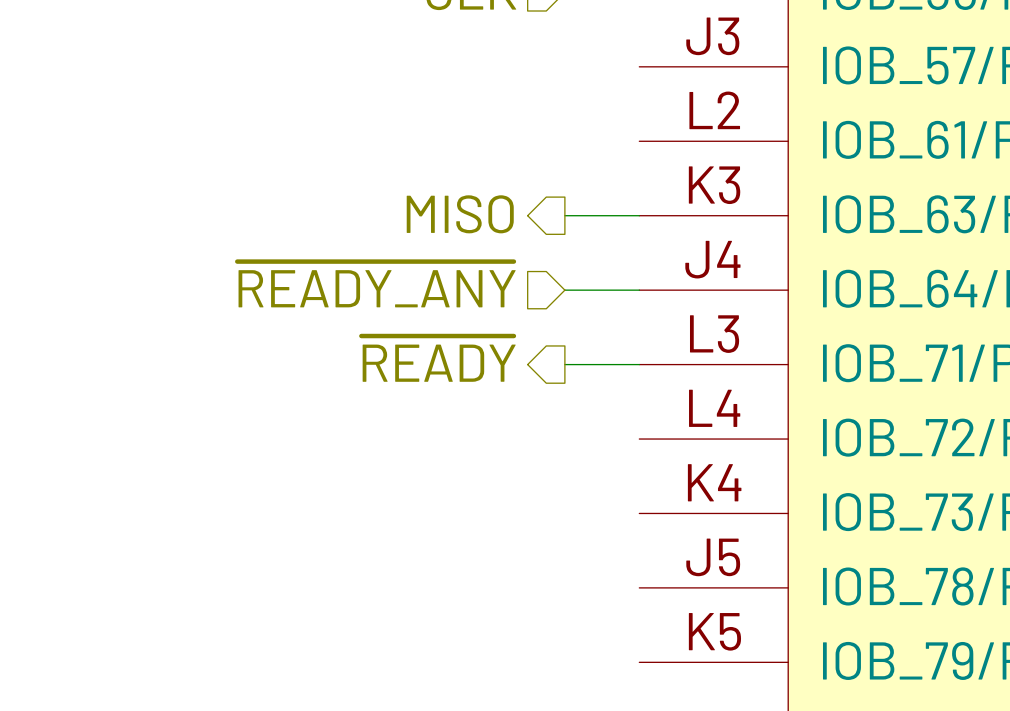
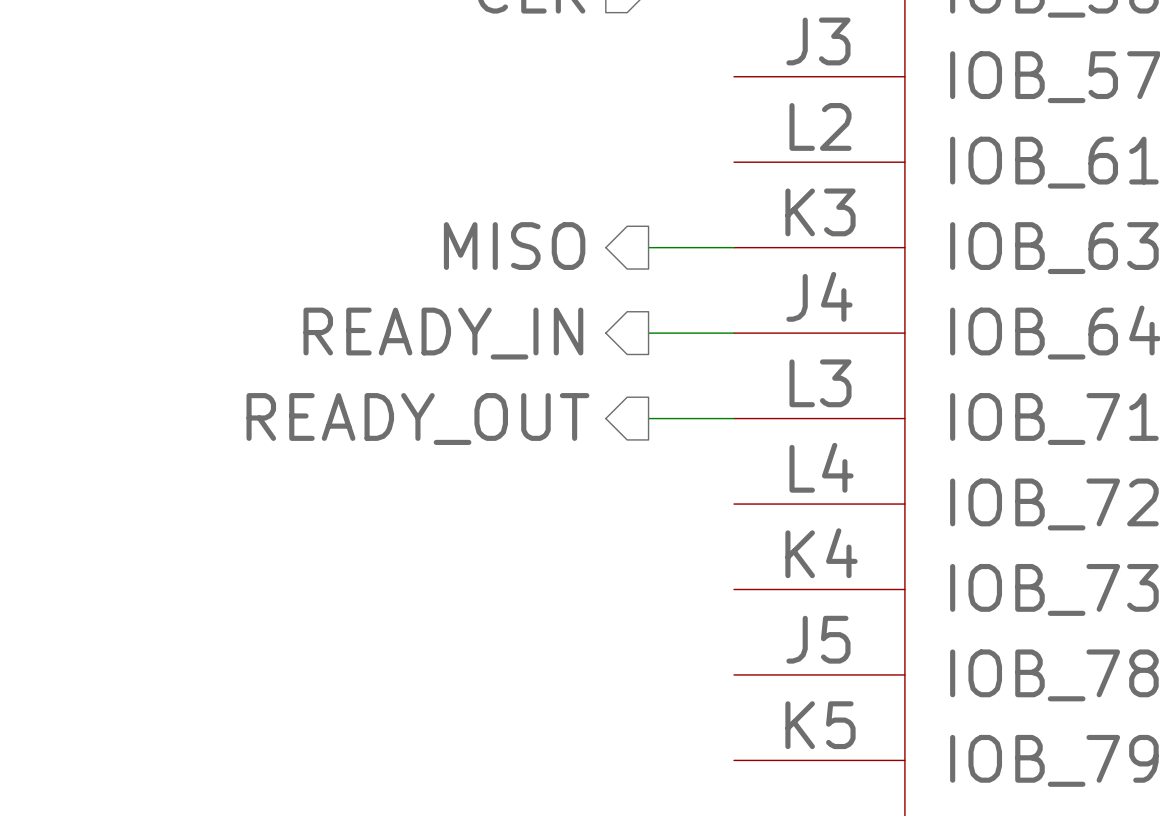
hierarchical label shape: input (376, 284) -> output (443, 333)
hierarchical label: ~{READY_ANY} (376, 284) -> READY_IN (443, 333)
hierarchical label: ~{READY} (438, 358) -> READY_OUT (417, 419)

